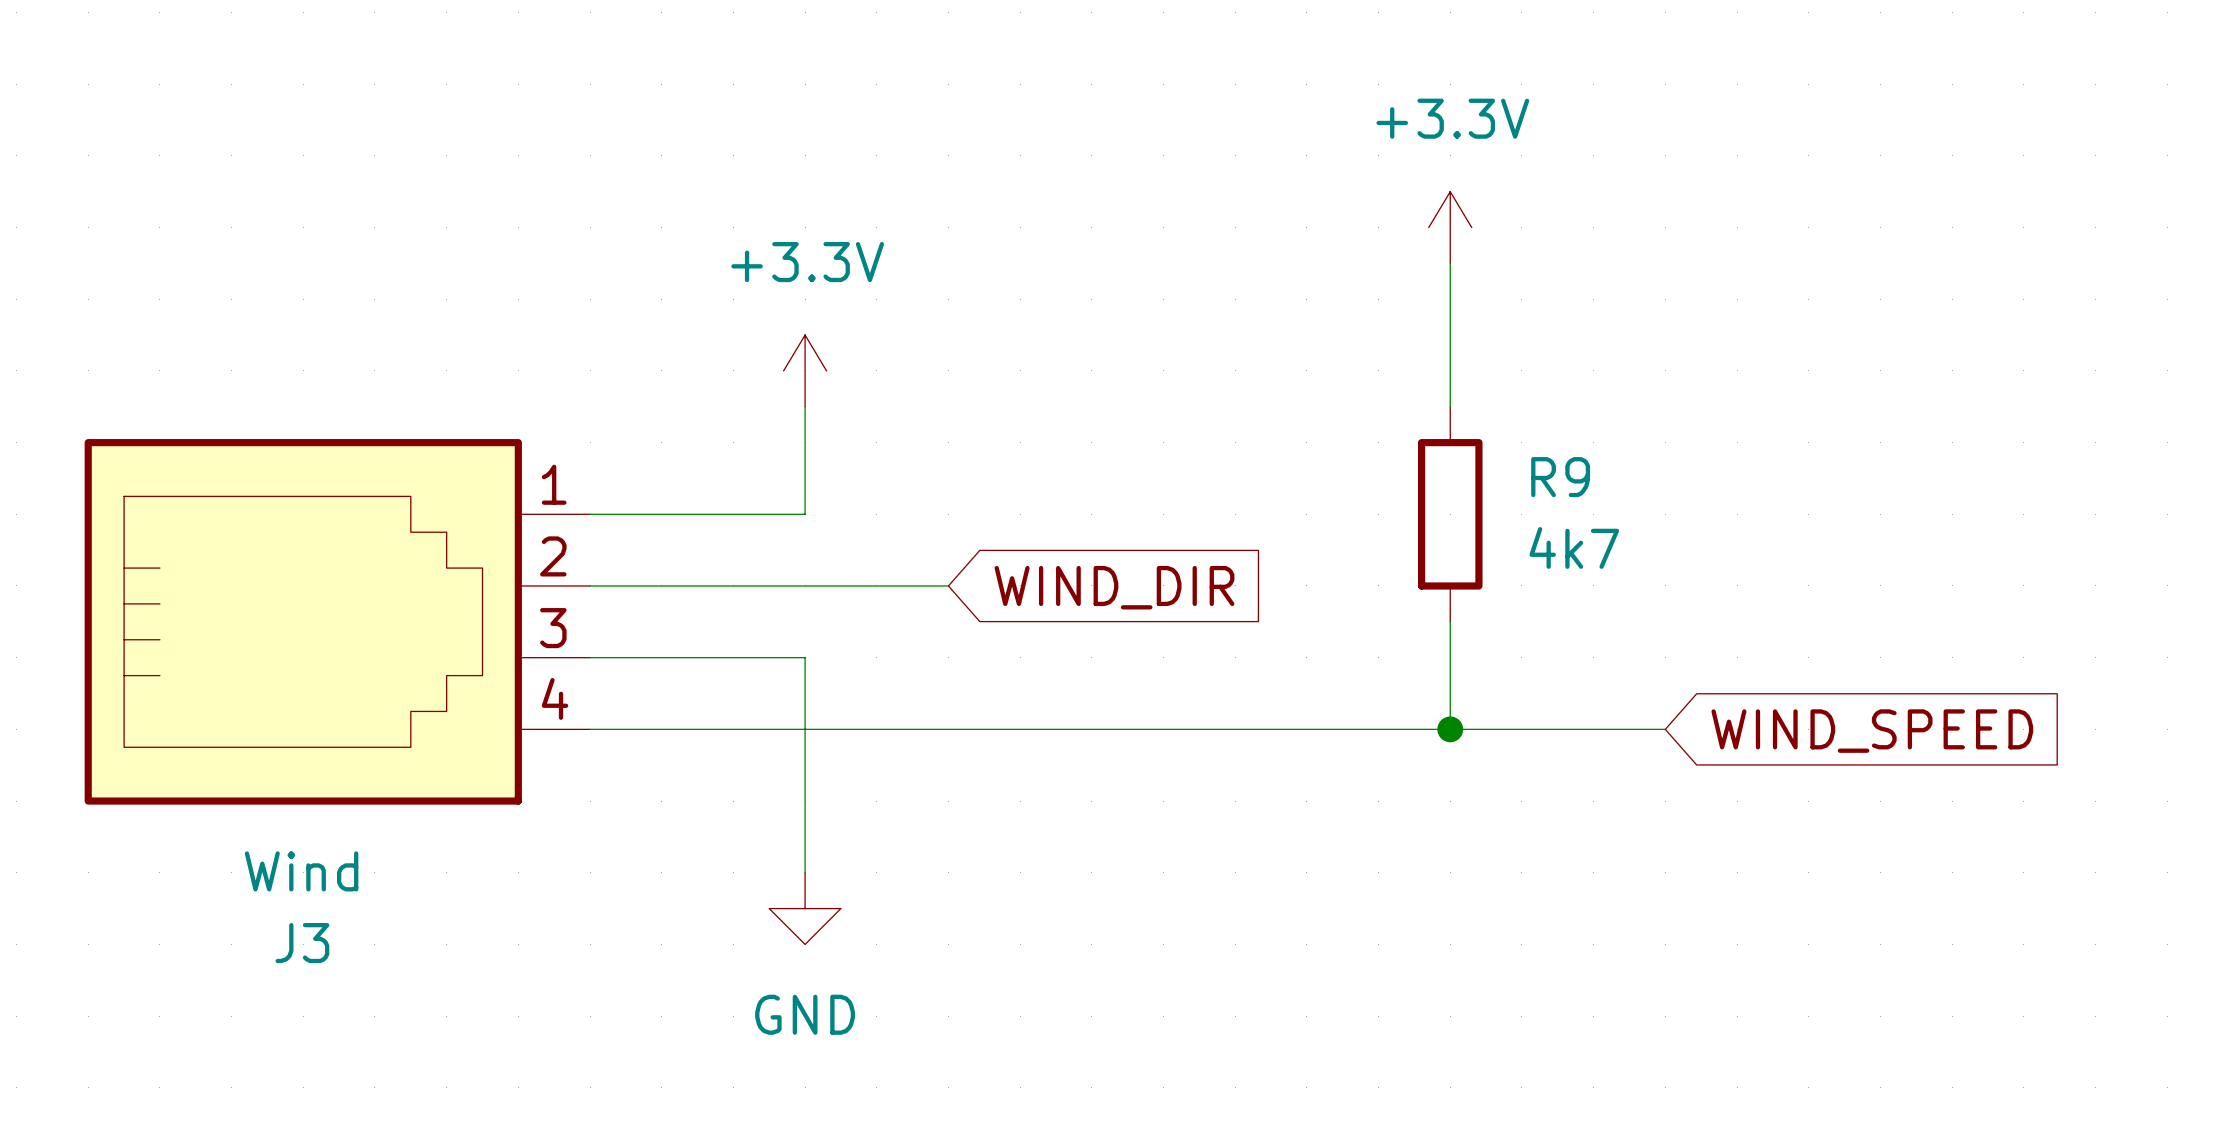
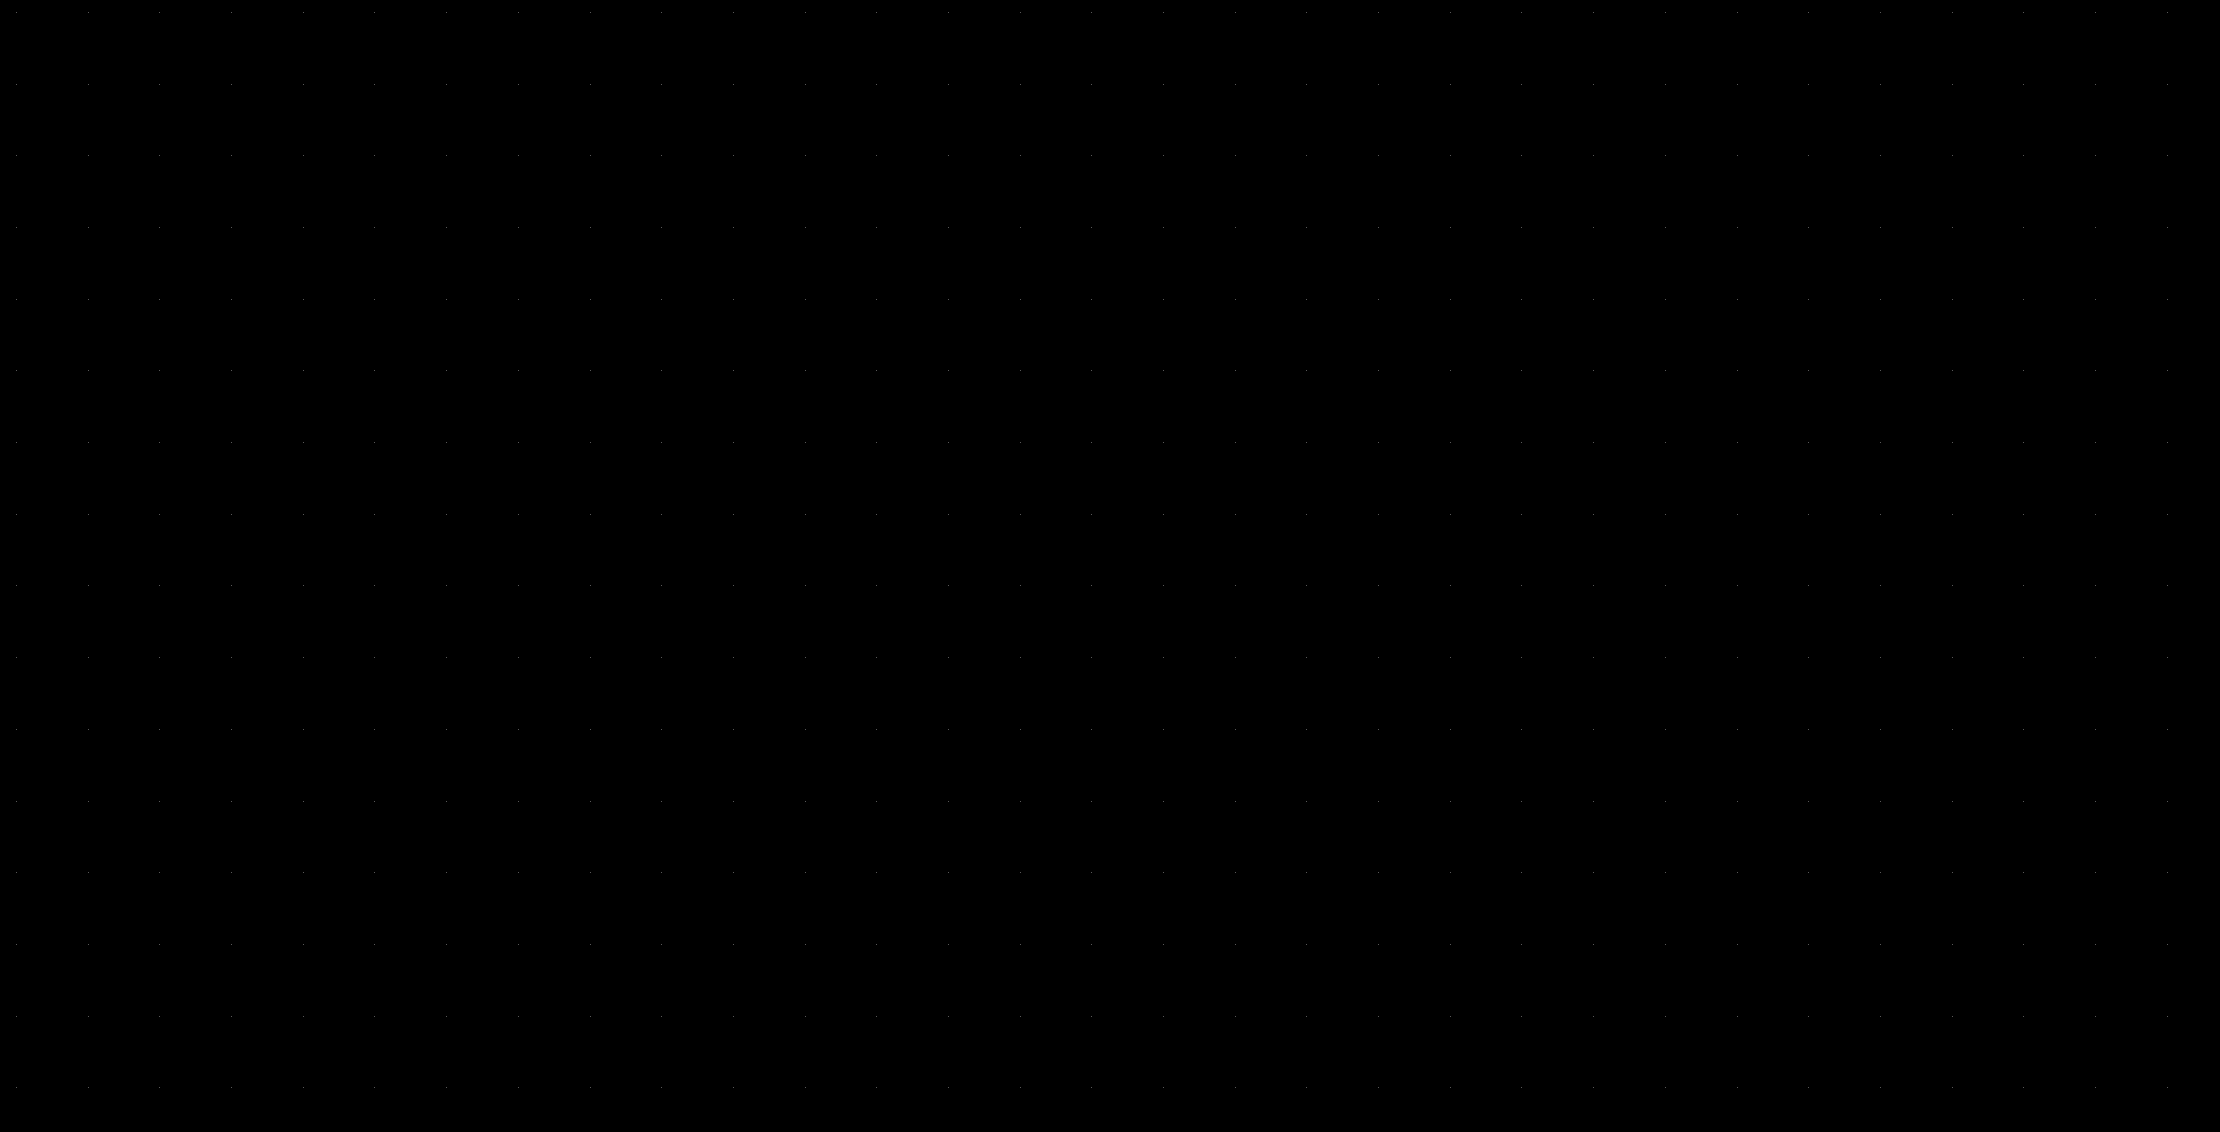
power symbol: +3.3V (1450, 227) -> none
wire: (1450, 263) (1450, 406) -> none
power symbol: +3.3V (805, 370) -> none
wire: (805, 406) (805, 514) (590, 514) -> none
R9: 4k7 (1450, 514) -> none
wire: (590, 585) (948, 585) -> none
global label: WIND_DIR (1114, 587) -> none
J3: Wind (337, 621) -> none
wire: (1450, 621) (1450, 729) -> none
wire: (590, 657) (805, 657) (805, 872) -> none
wire: (590, 729) (1665, 729) -> none
junction: (1450, 729) -> none
global label: WIND_SPEED (1872, 731) -> none
power symbol: GND (805, 908) -> none

